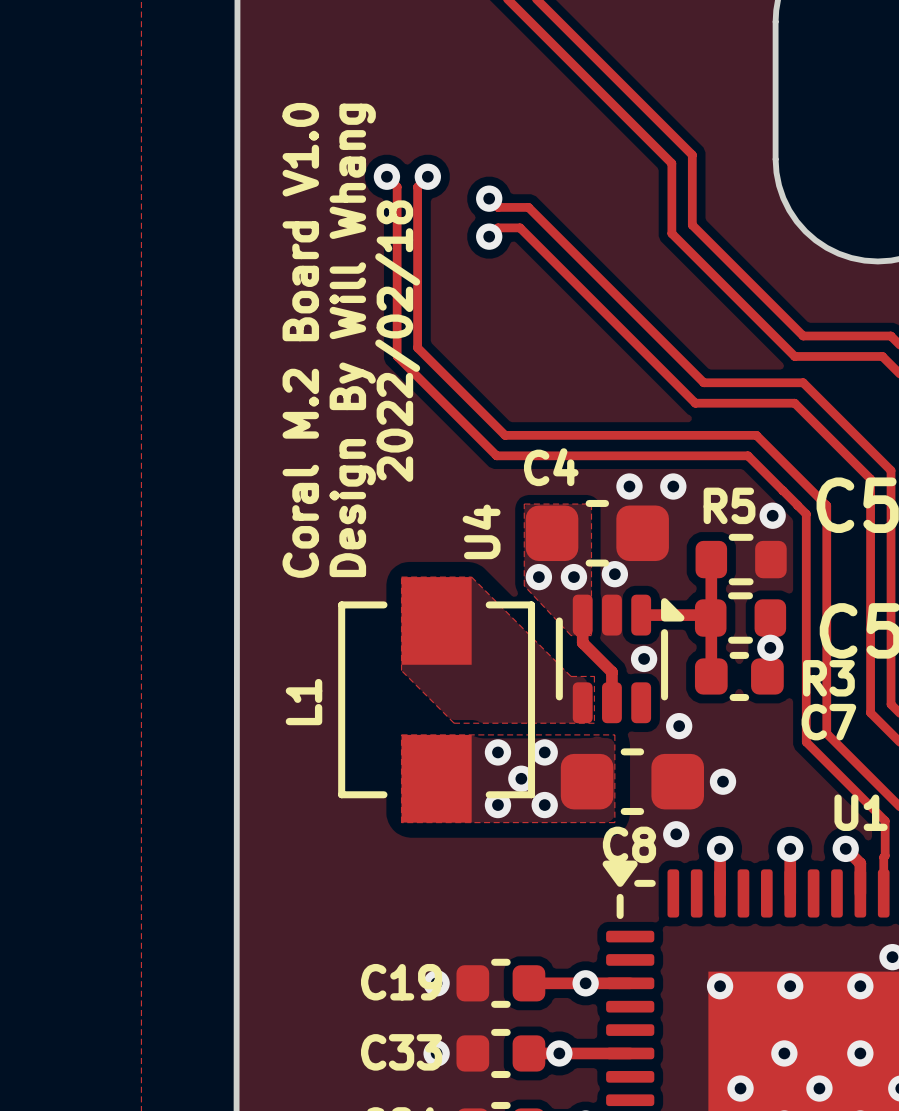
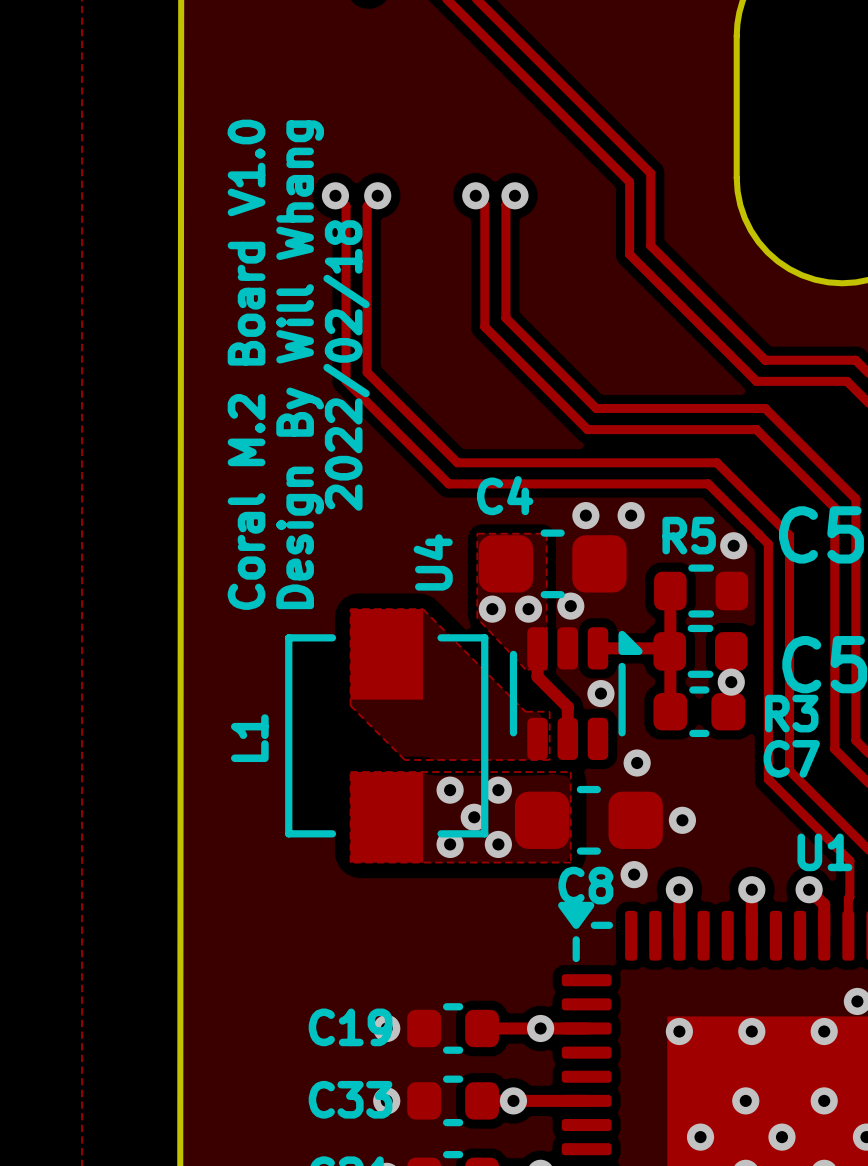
via: none -> (475, 195)
via: none -> (514, 195)
track: (489, 198) (497, 207) (528, 207) (703, 382) -> (514, 195) (505, 204) (505, 318) (596, 408) (662, 408)
via: (489, 198) -> none
track: (489, 236) (497, 227) (520, 227) (695, 403) -> (475, 195) (484, 204) (484, 326) (587, 429) (653, 429)
via: (489, 236) -> none

